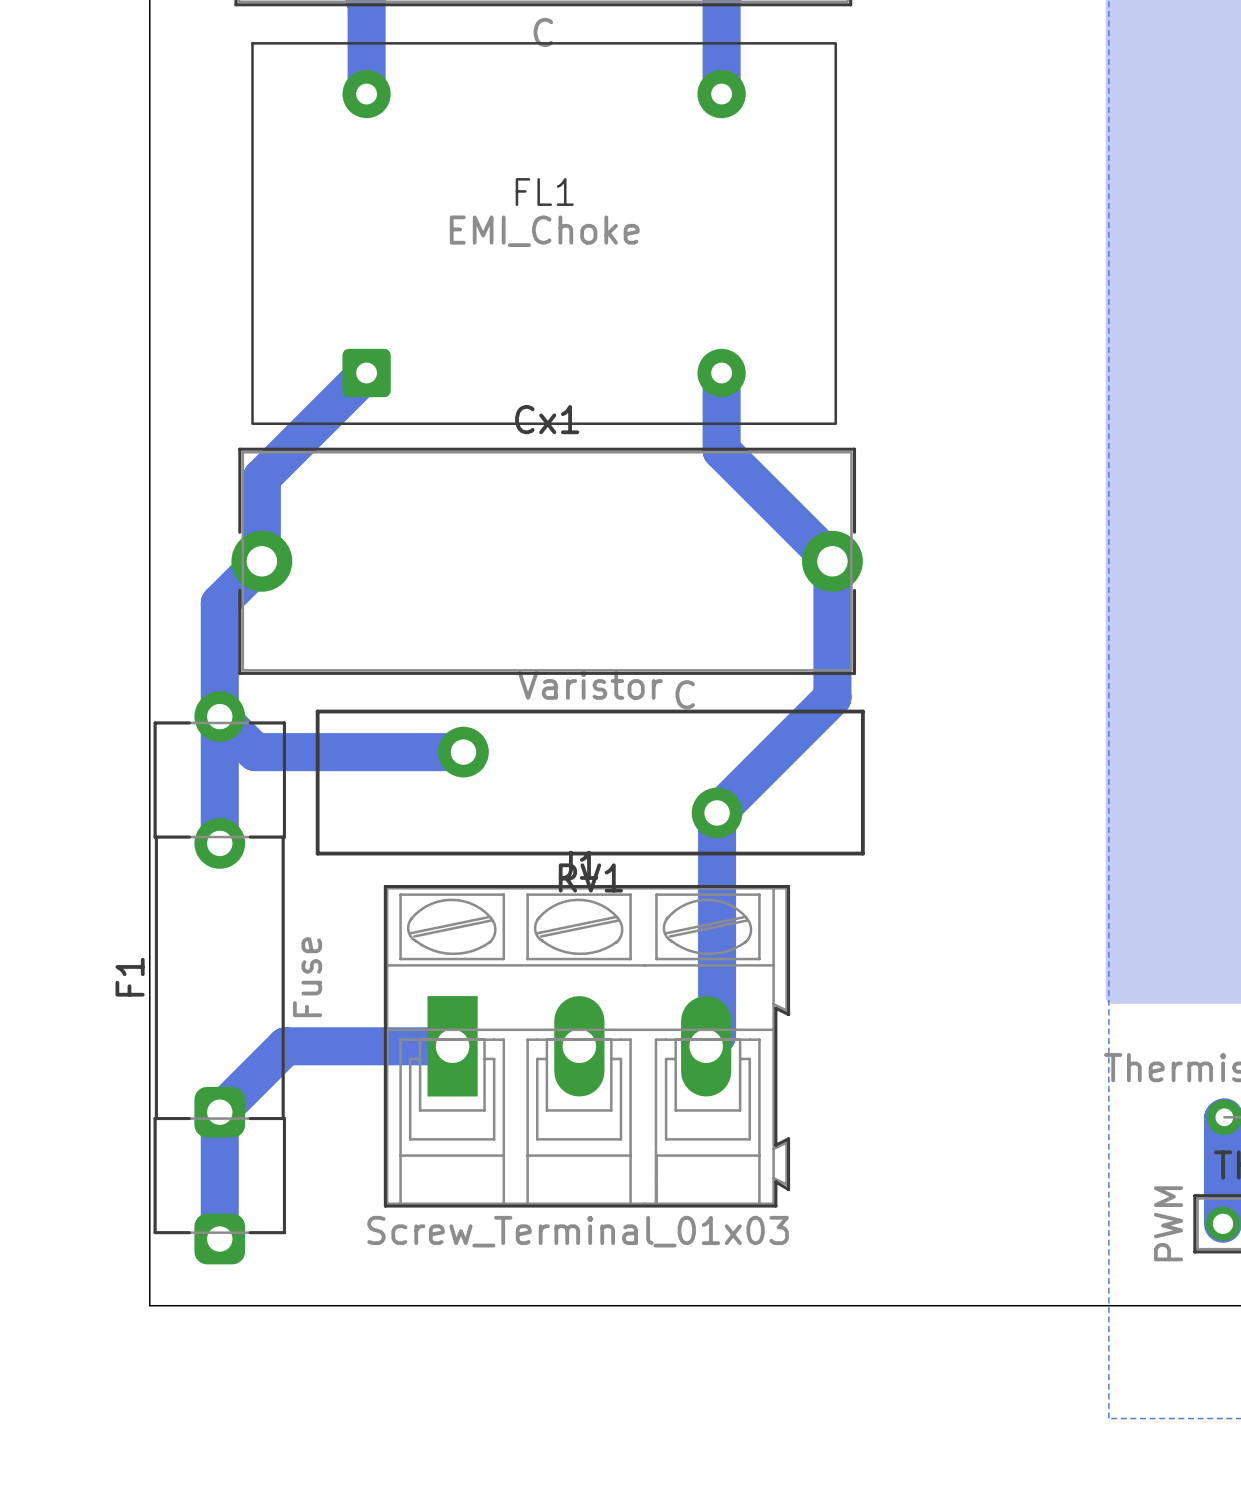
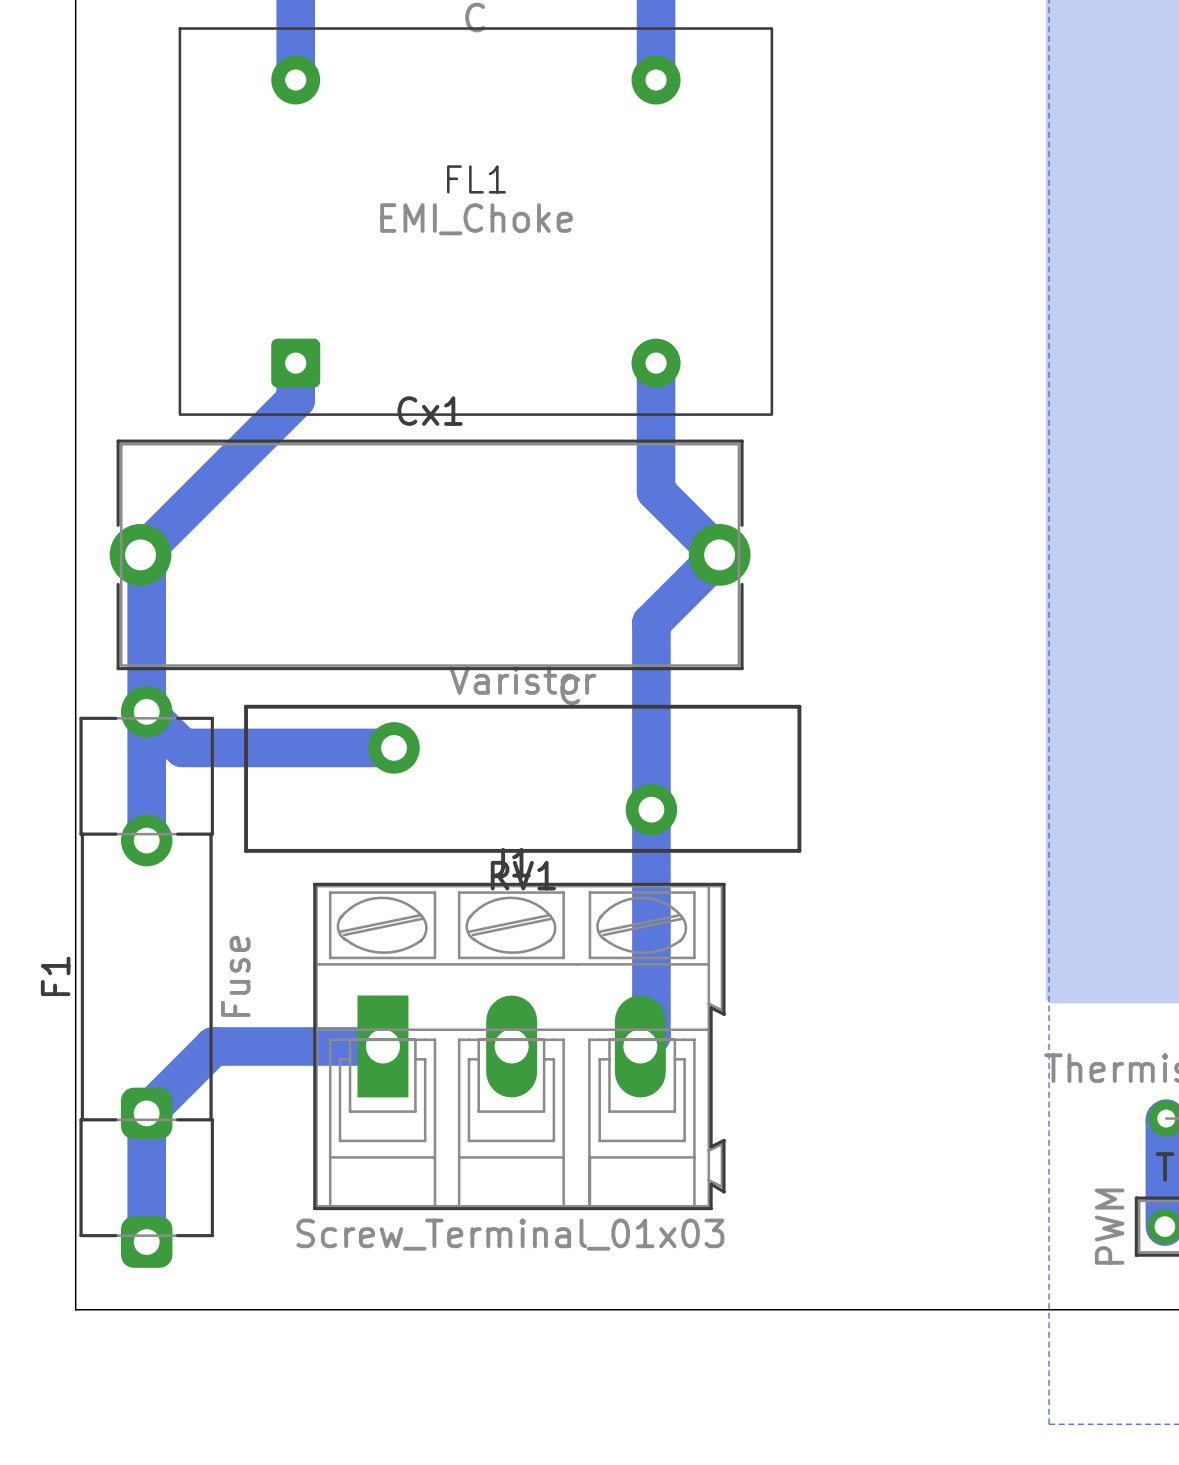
bottom track: (366, 373) (261, 477) (261, 561) (219, 603) -> (295, 363) (295, 399) (140, 554) (146, 561) (146, 596)
bottom track: (721, 450) (832, 561) (832, 697) (717, 812) -> (656, 441) (656, 491) (719, 554) (651, 623) (651, 809)
Cx1 position: (547, 561) -> (430, 554)

